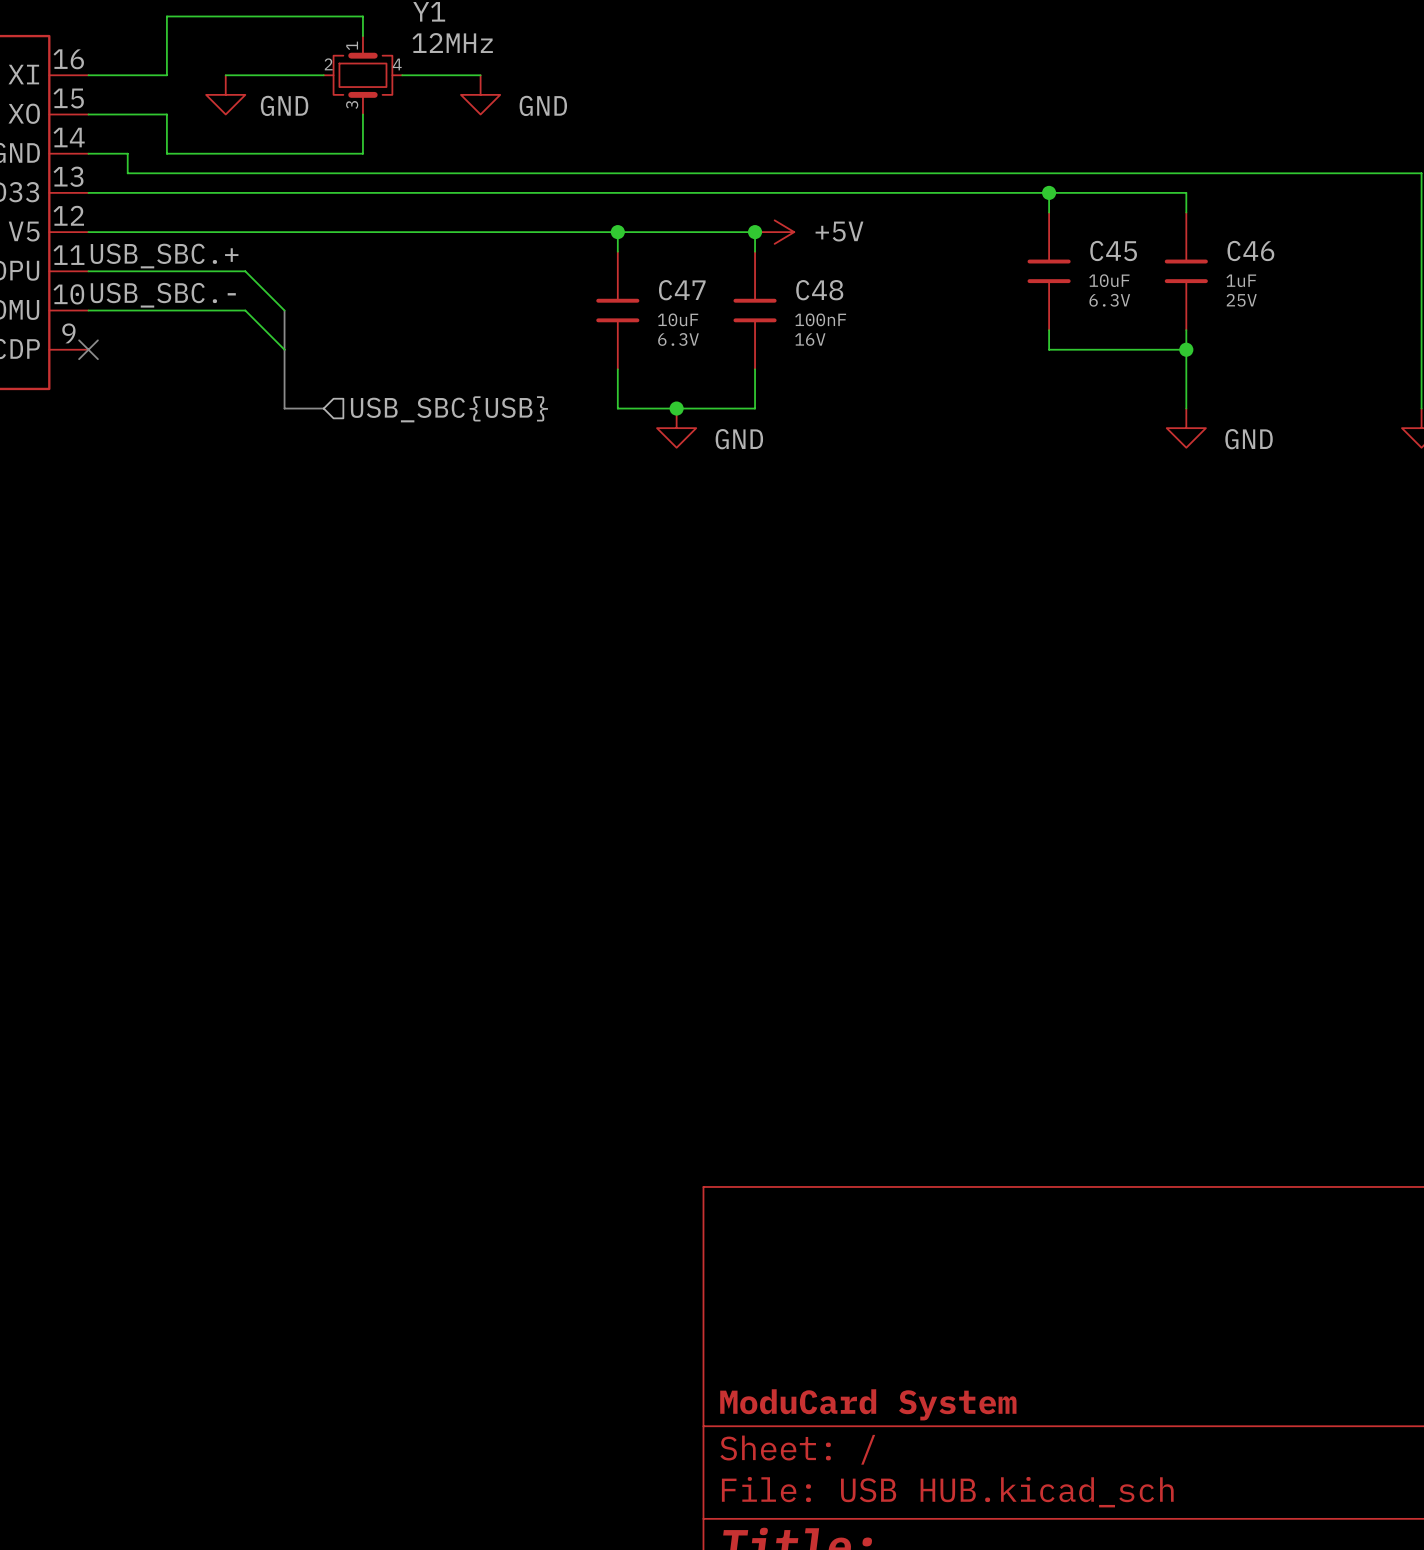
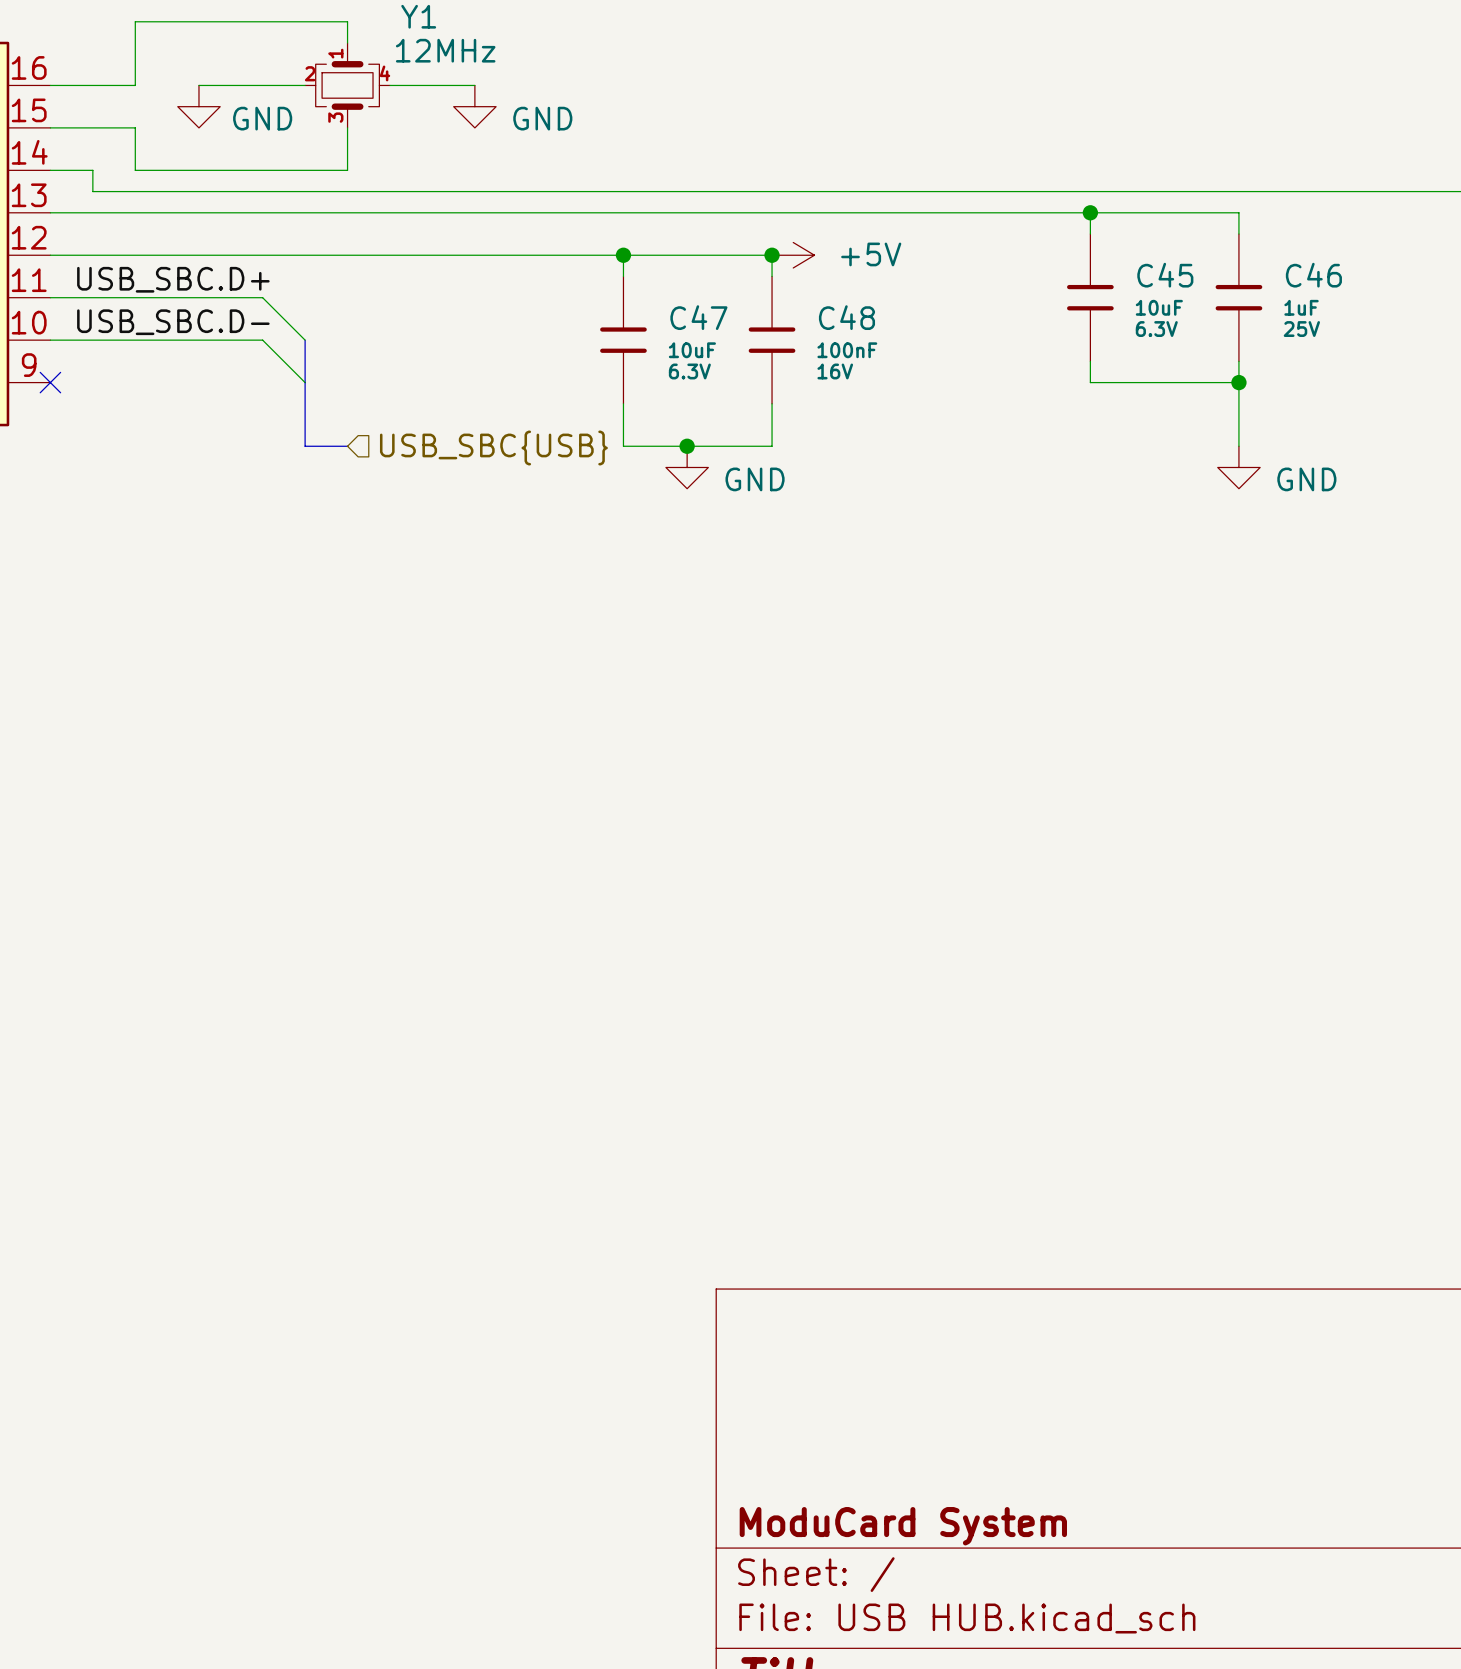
label: USB_SBC.+ (164, 256) -> USB_SBC.D+ (173, 279)
wire: (245, 271) (284, 310) -> (220, 297) (262, 297) (305, 340)
label: USB_SBC.- (163, 295) -> USB_SBC.D- (173, 322)
wire: (245, 310) (284, 349) -> (220, 340) (262, 340) (305, 382)
bus: (284, 310) (284, 408) (323, 408) -> (305, 340) (305, 446) (347, 446)
hierarchical label position: USB_SBC{USB} (449, 409) -> USB_SBC{USB} (493, 447)

